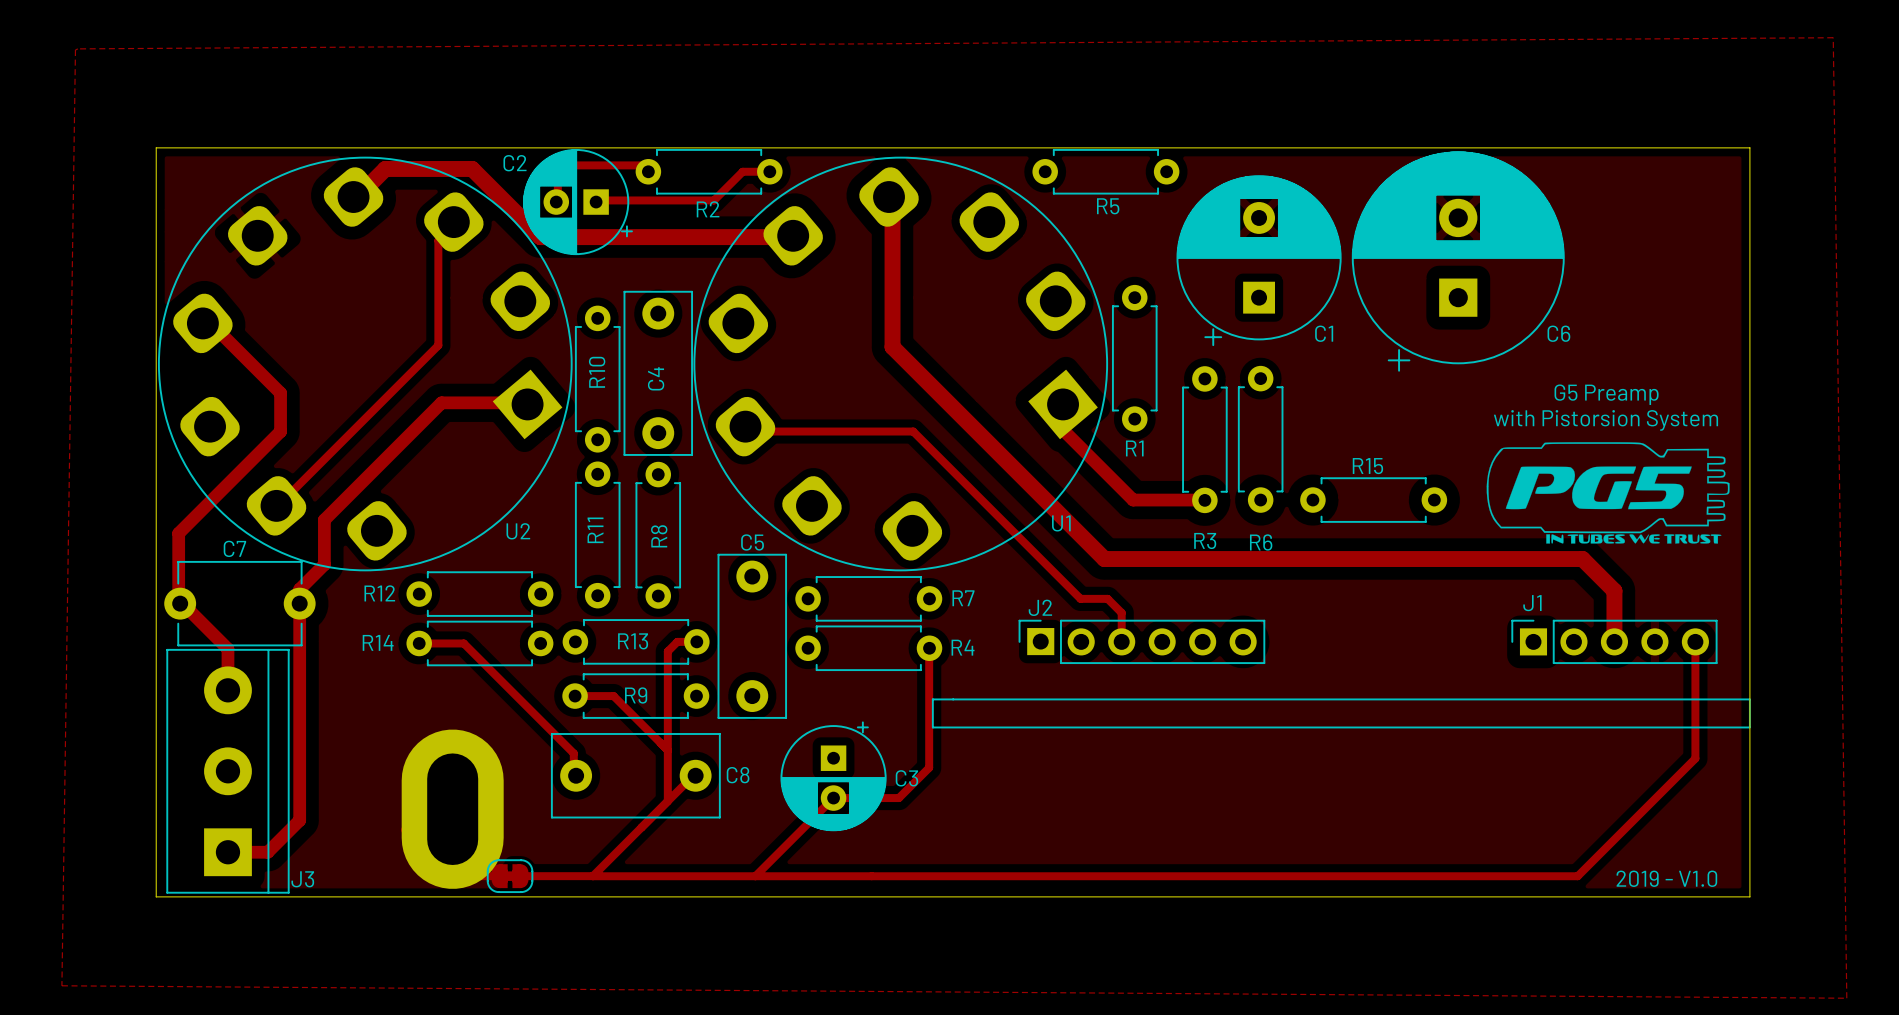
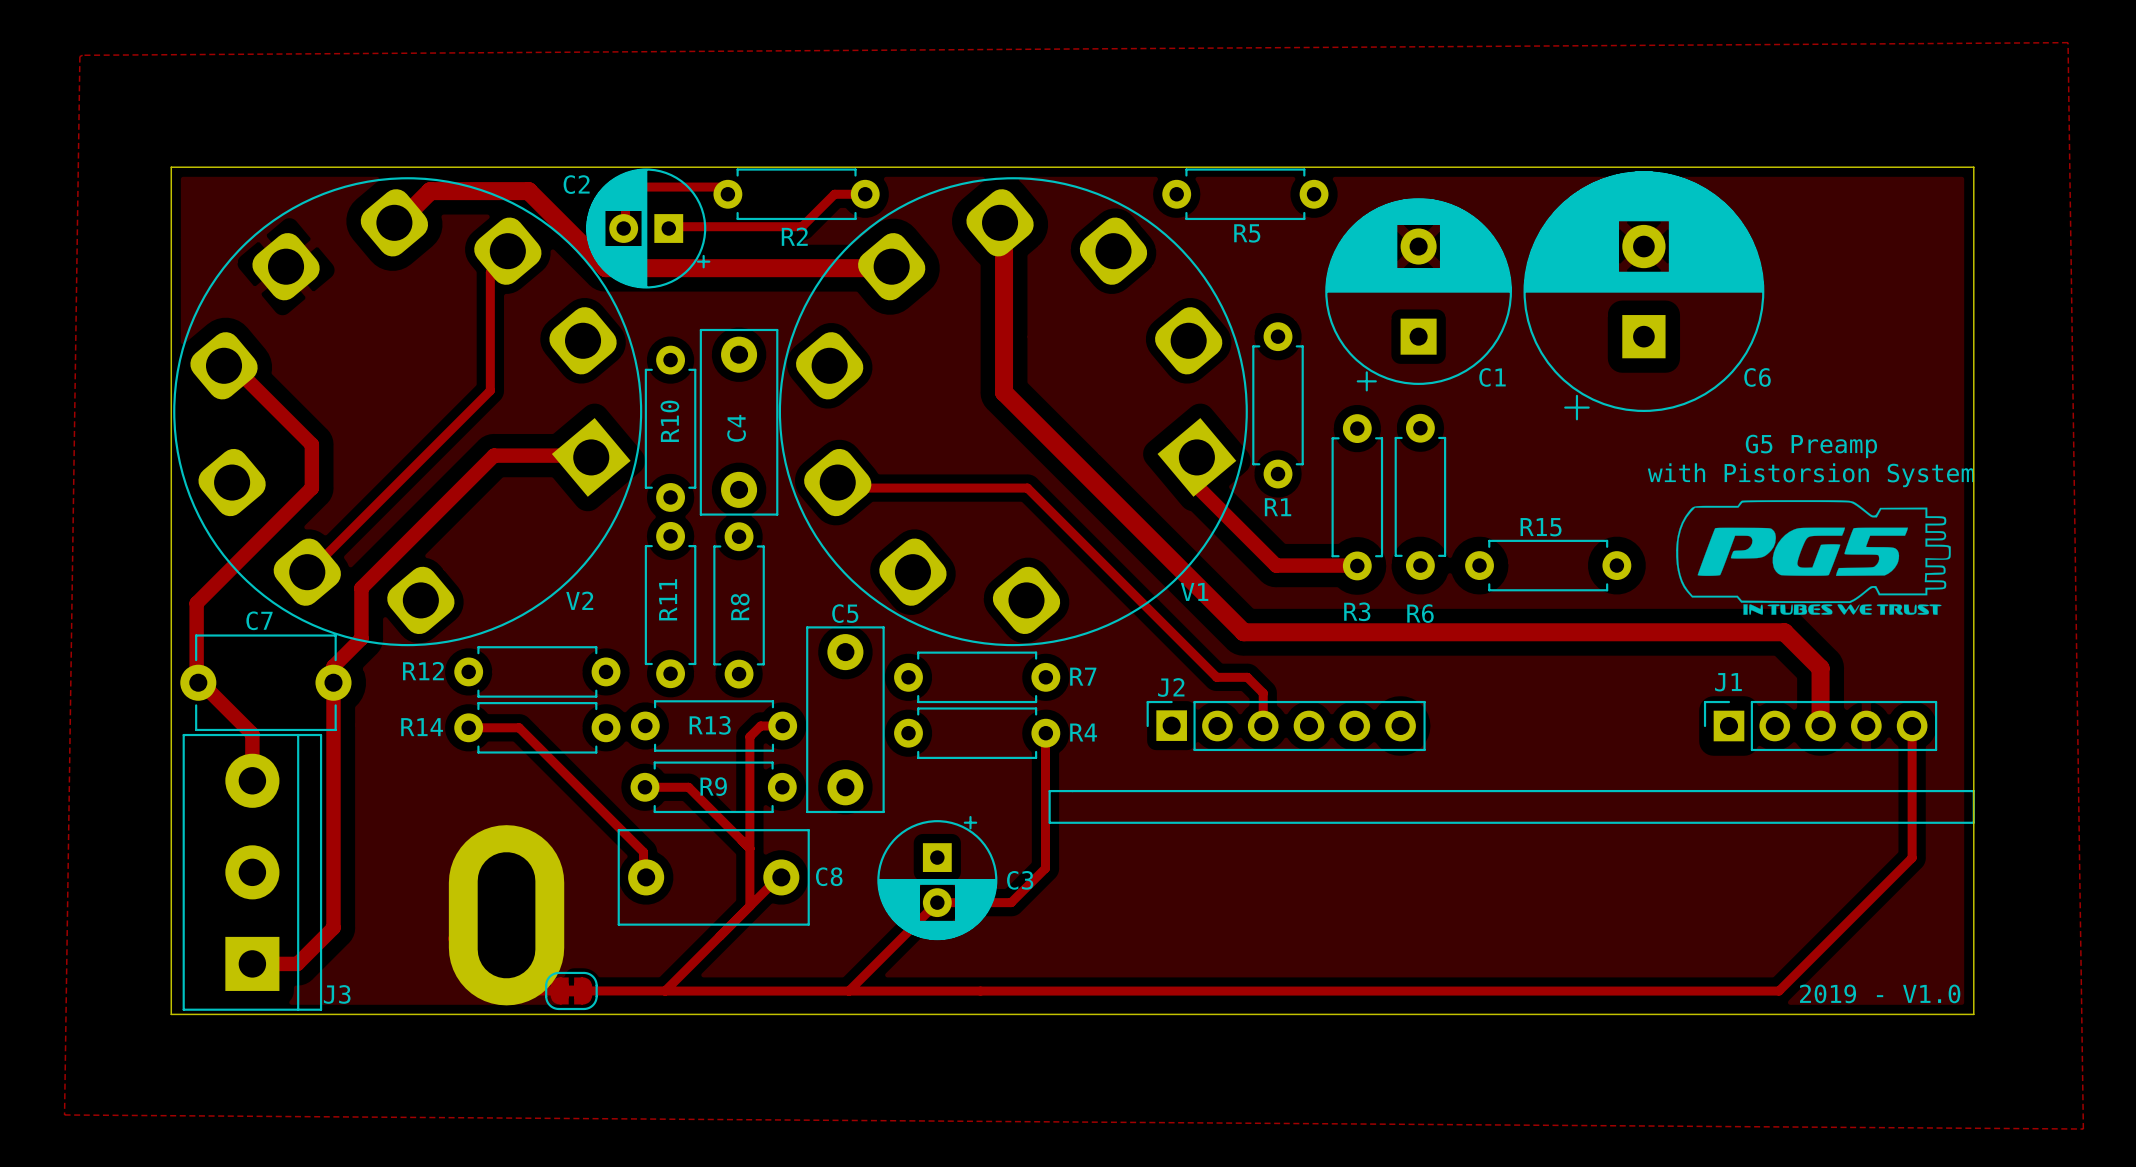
U1 name: U1 (1061, 523) -> V1 (1194, 591)
U2 name: U2 (518, 531) -> V2 (579, 600)

